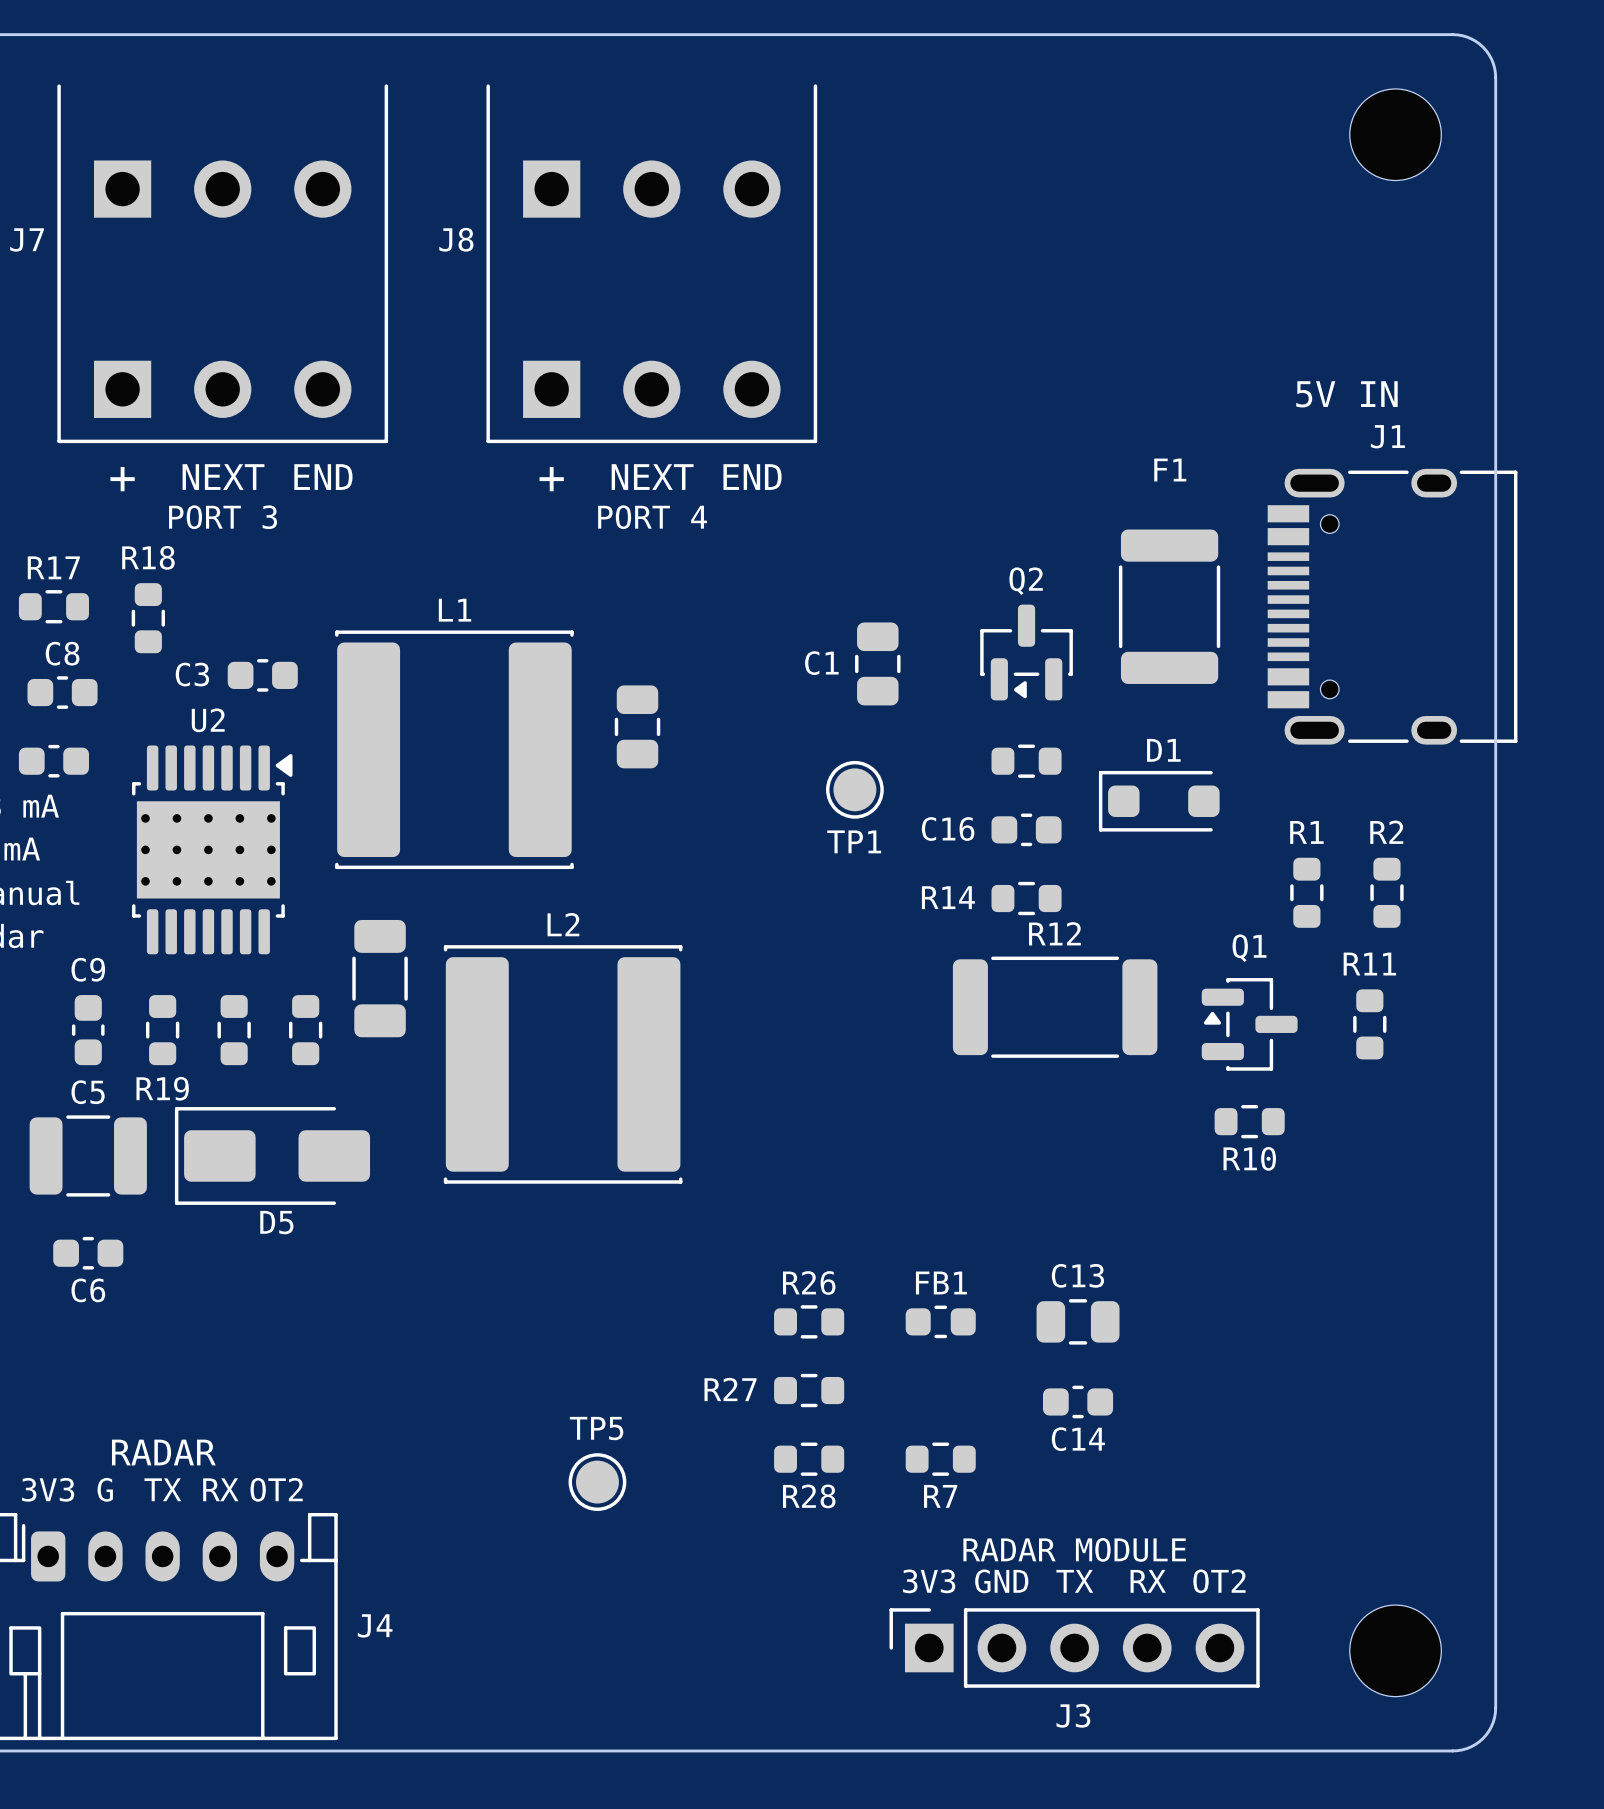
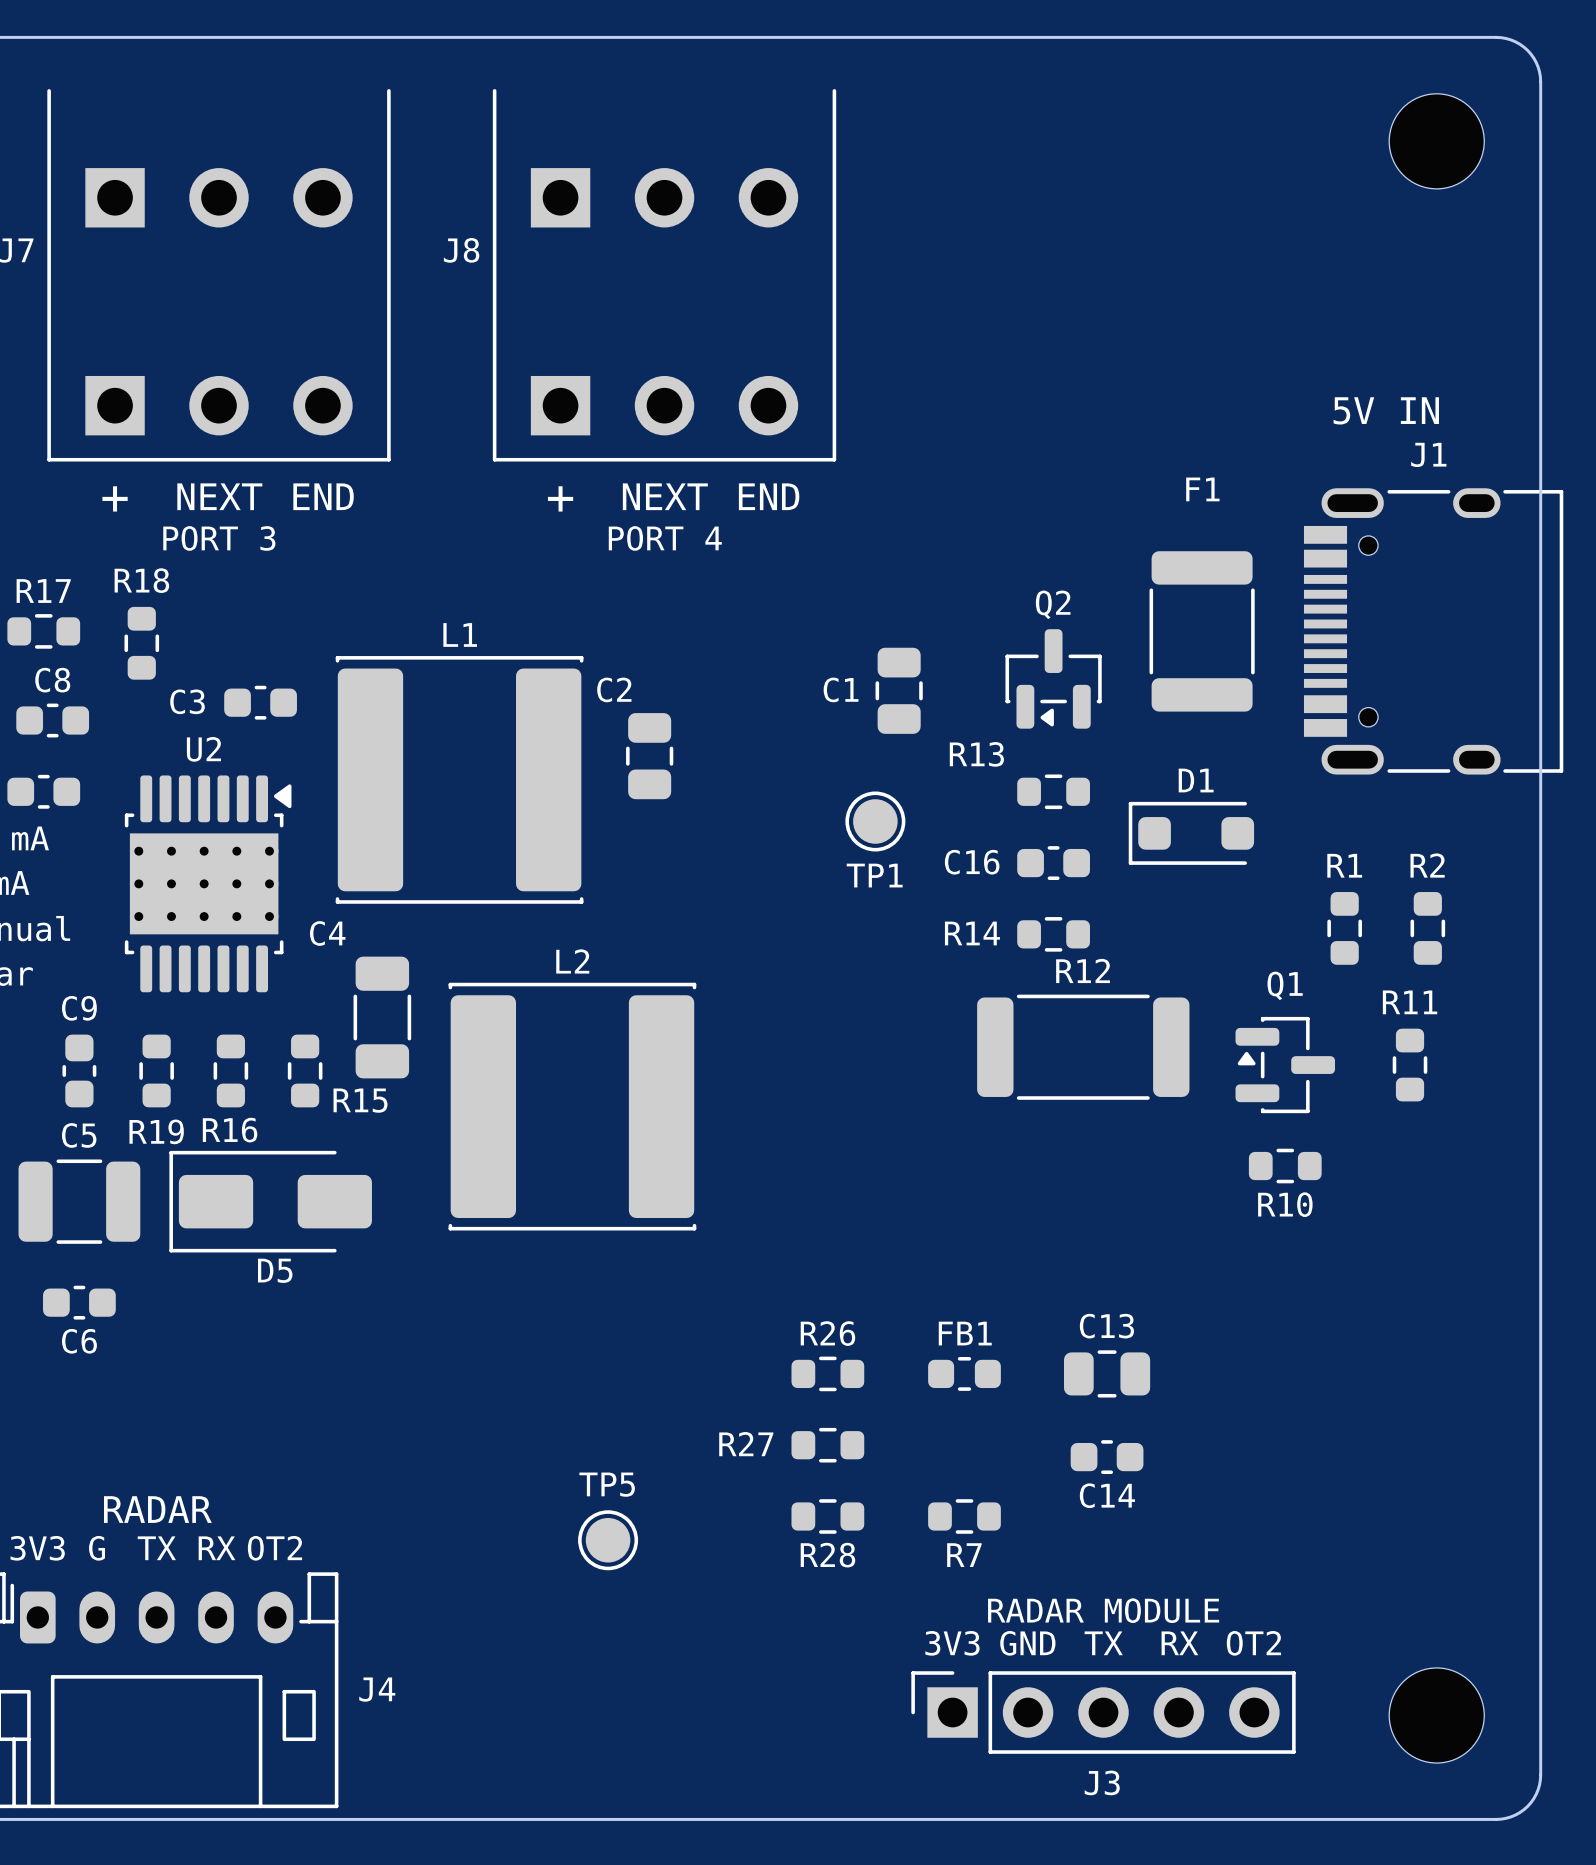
C2 name: none -> C2 (614, 689)
R13 name: none -> R13 (976, 754)
C4 name: none -> C4 (327, 933)
R15 name: none -> R15 (360, 1100)
R16 name: none -> R16 (230, 1130)

